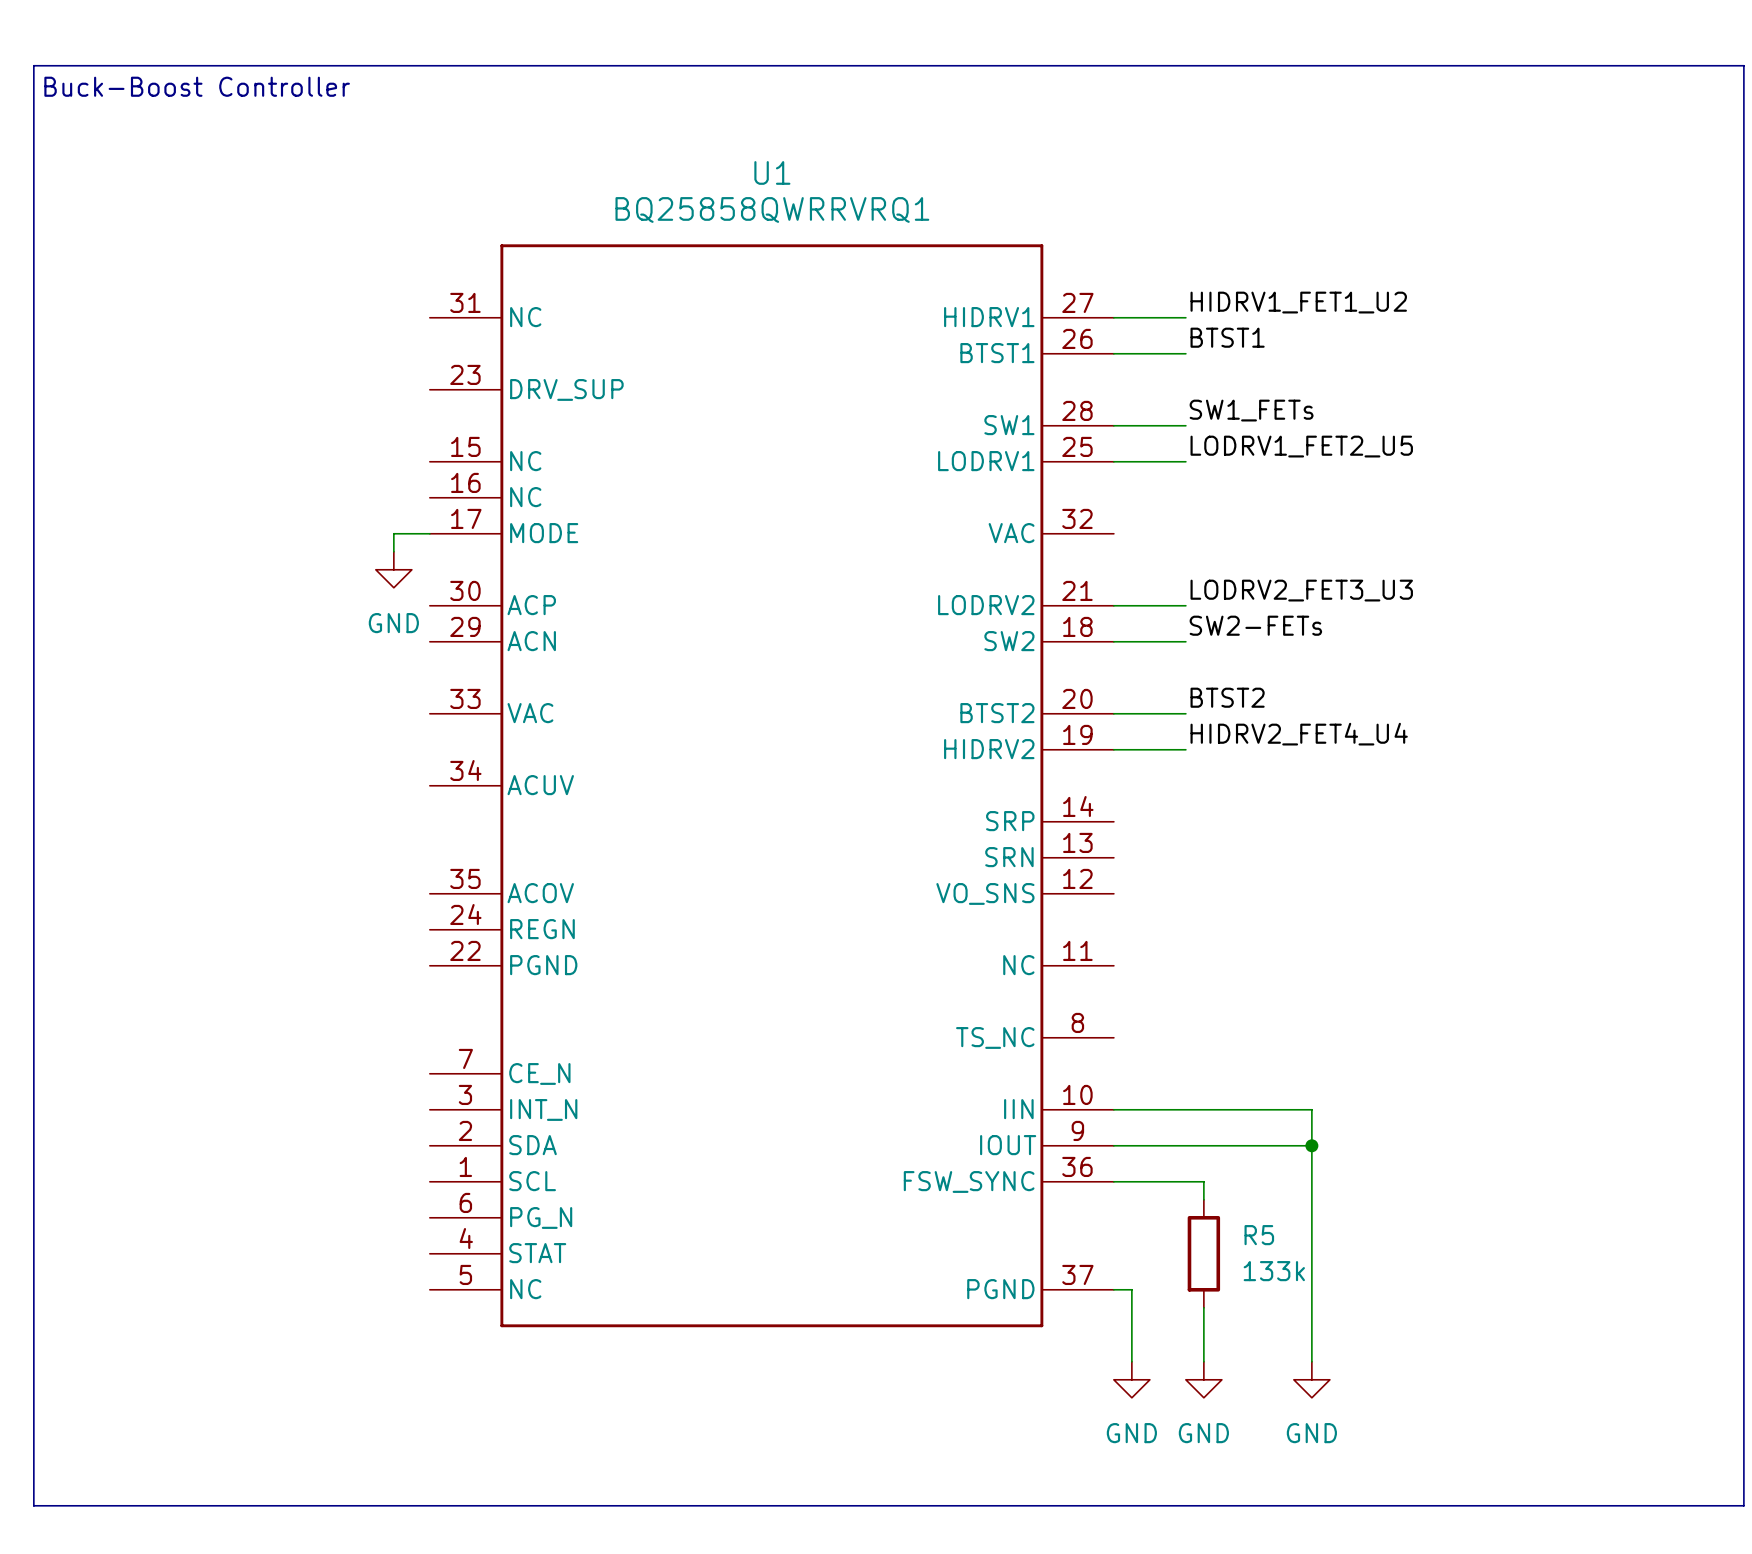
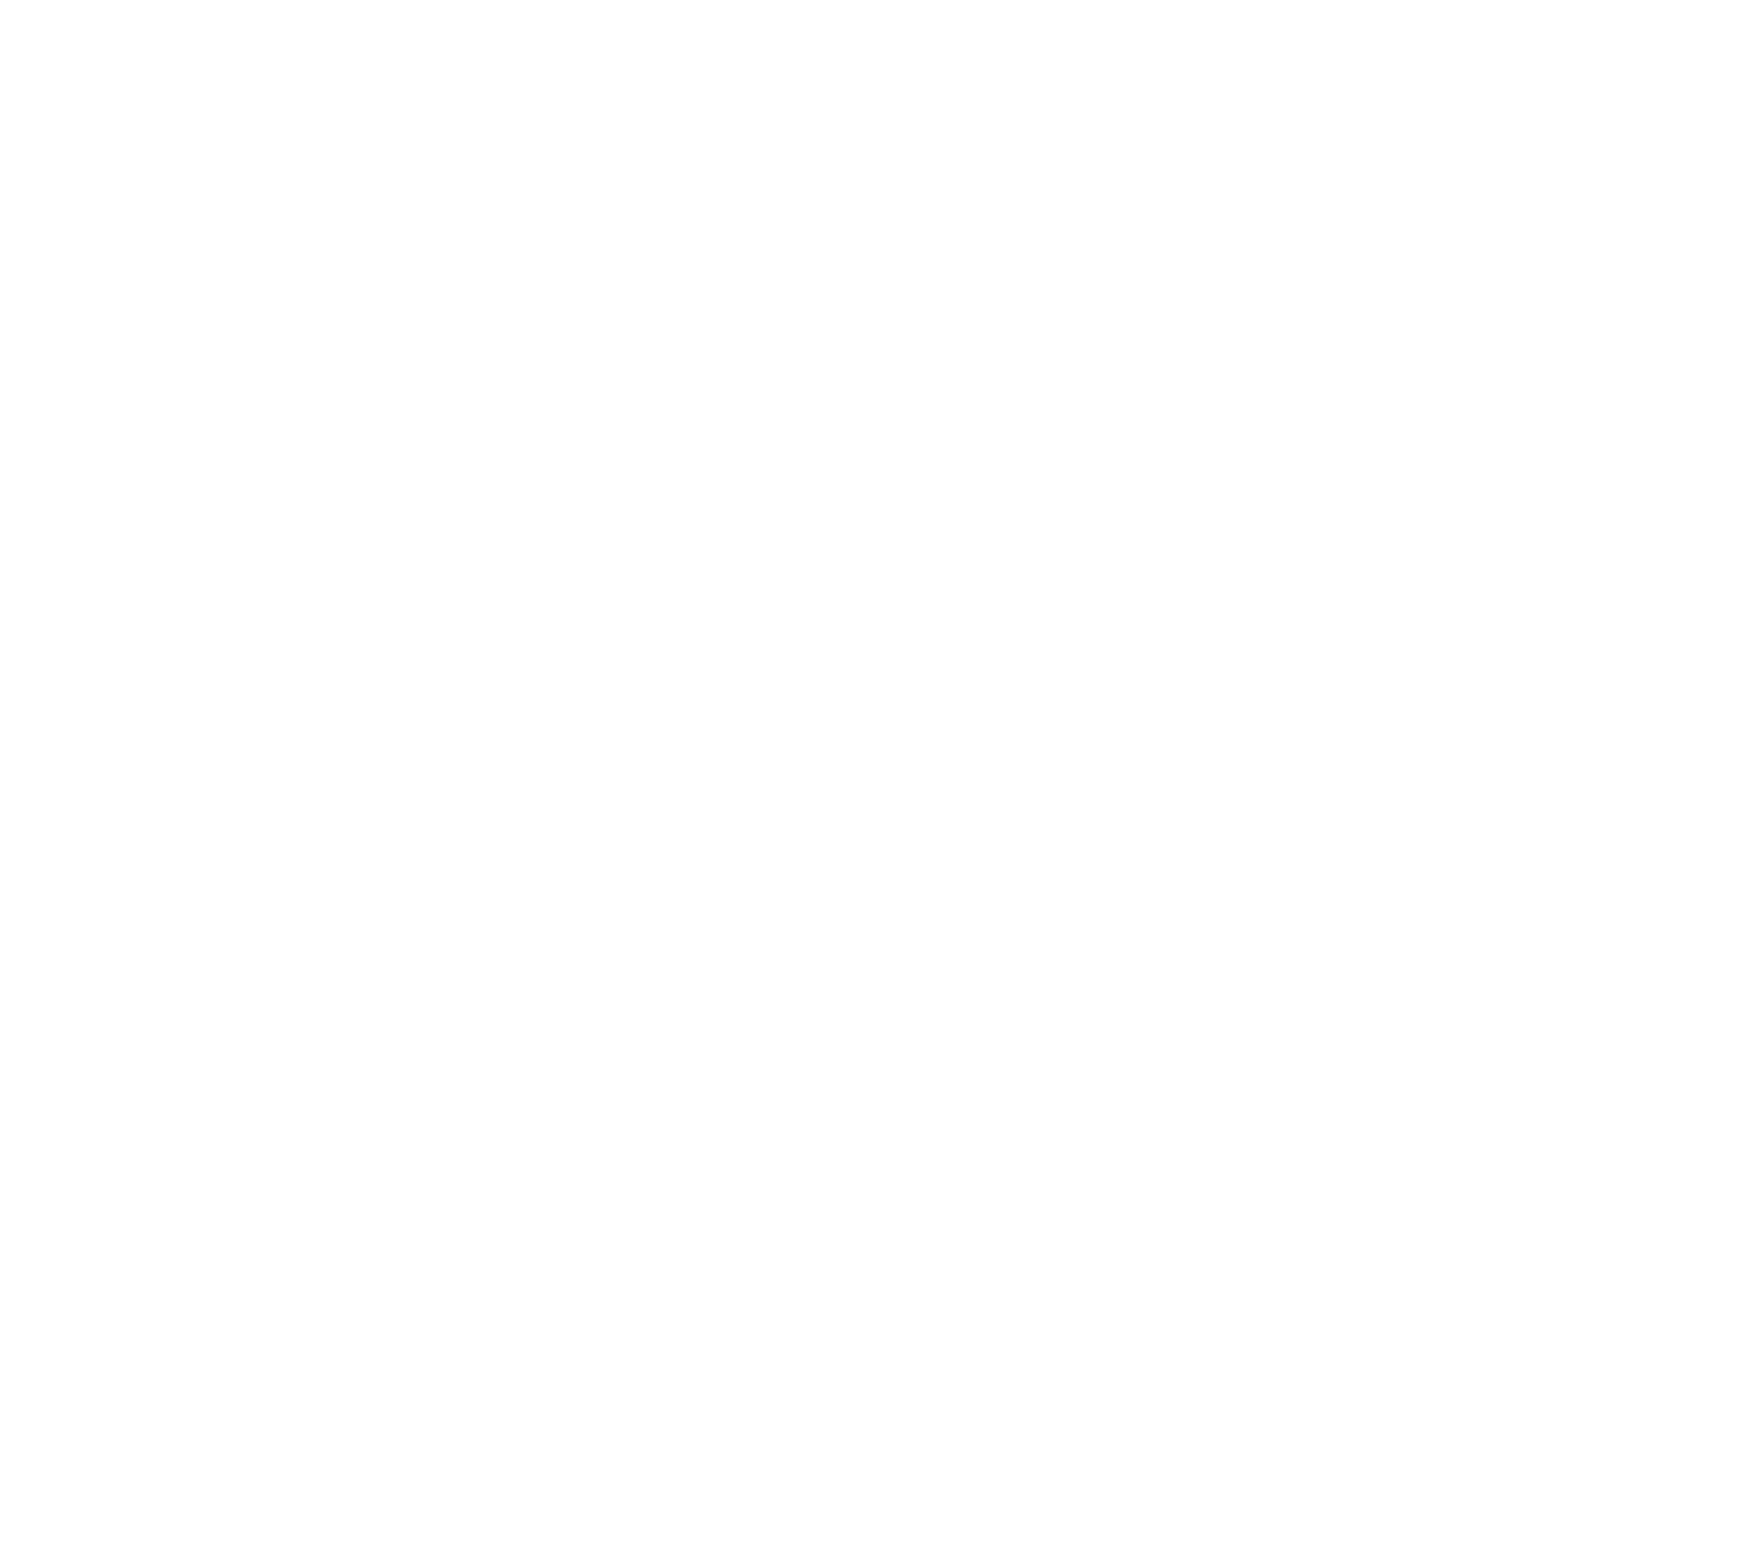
line: (33, 65) (1743, 65) (1743, 1505) (33, 1505) (33, 65) -> none
text: Buck-Boost Controller (197, 86) -> none
label: HIDRV1_FET1_U2 (1298, 302) -> none
wire: (1113, 317) (1185, 317) -> none
label: BTST1 (1227, 337) -> none
wire: (1113, 353) (1185, 353) -> none
label: SW1_FETs (1251, 410) -> none
wire: (1113, 425) (1185, 425) -> none
label: LODRV1_FET2_U5 (1301, 446) -> none
wire: (1113, 461) (1185, 461) -> none
wire: (429, 533) (393, 533) (393, 551) -> none
power symbol: GND (393, 569) -> none
label: LODRV2_FET3_U3 (1301, 590) -> none
wire: (1113, 605) (1185, 605) -> none
label: SW2-FETs (1255, 625) -> none
wire: (1113, 641) (1185, 641) -> none
label: BTST2 (1227, 697) -> none
wire: (1113, 713) (1185, 713) -> none
label: HIDRV2_FET4_U4 (1299, 734) -> none
wire: (1113, 749) (1185, 749) -> none
U1: BQ25858QWRRVRQ1 (771, 785) -> none
wire: (1113, 1109) (1311, 1109) (1311, 1361) -> none
wire: (1113, 1145) (1311, 1145) -> none
junction: (1311, 1145) -> none
wire: (1113, 1181) (1203, 1181) (1203, 1199) -> none
R5: 133k (1203, 1253) -> none
wire: (1113, 1289) (1131, 1289) (1131, 1361) -> none
wire: (1203, 1307) (1203, 1361) -> none
power symbol: GND (1131, 1379) -> none
power symbol: GND (1203, 1379) -> none
power symbol: GND (1311, 1379) -> none

